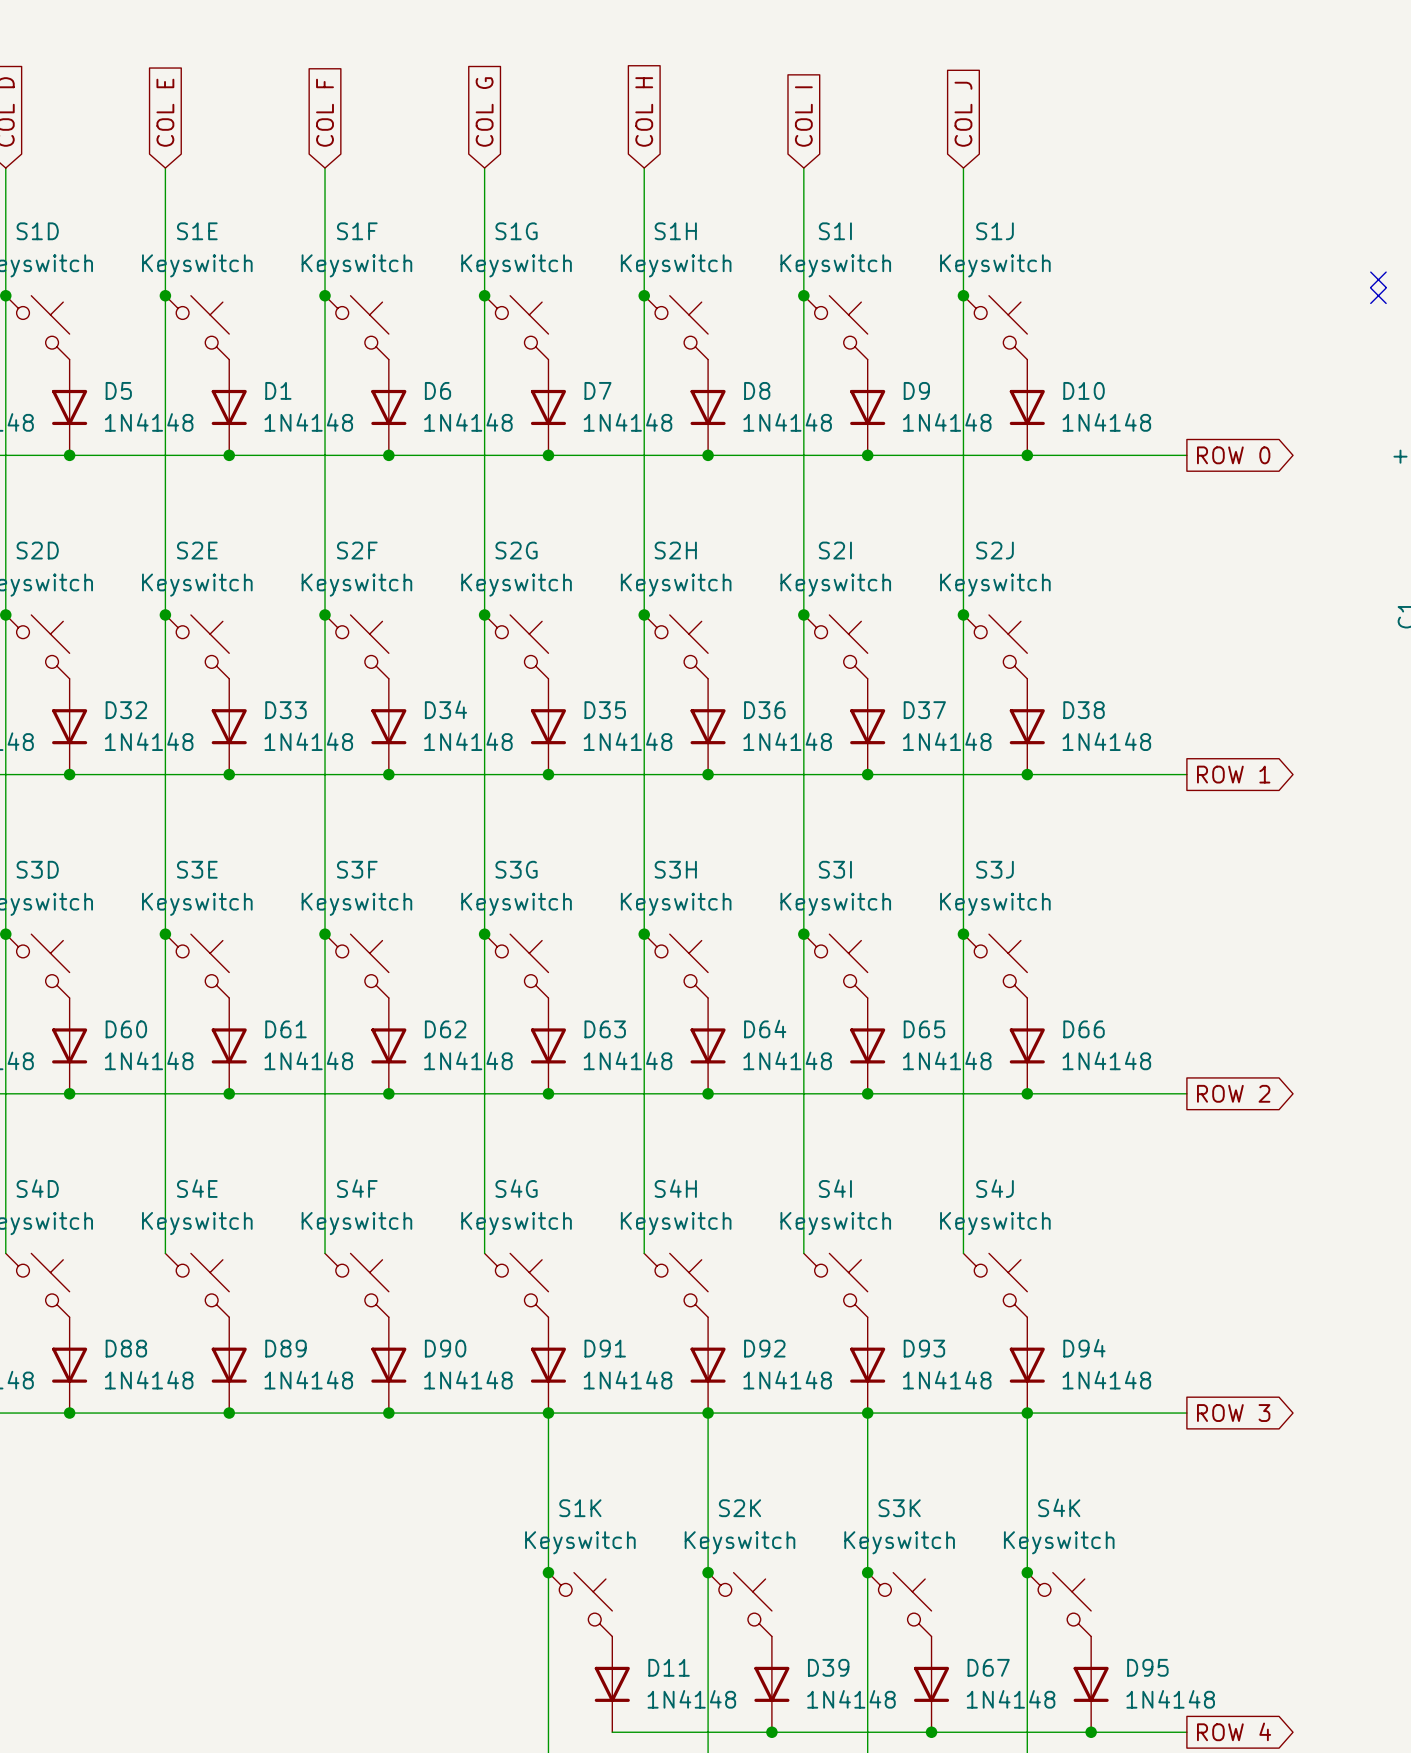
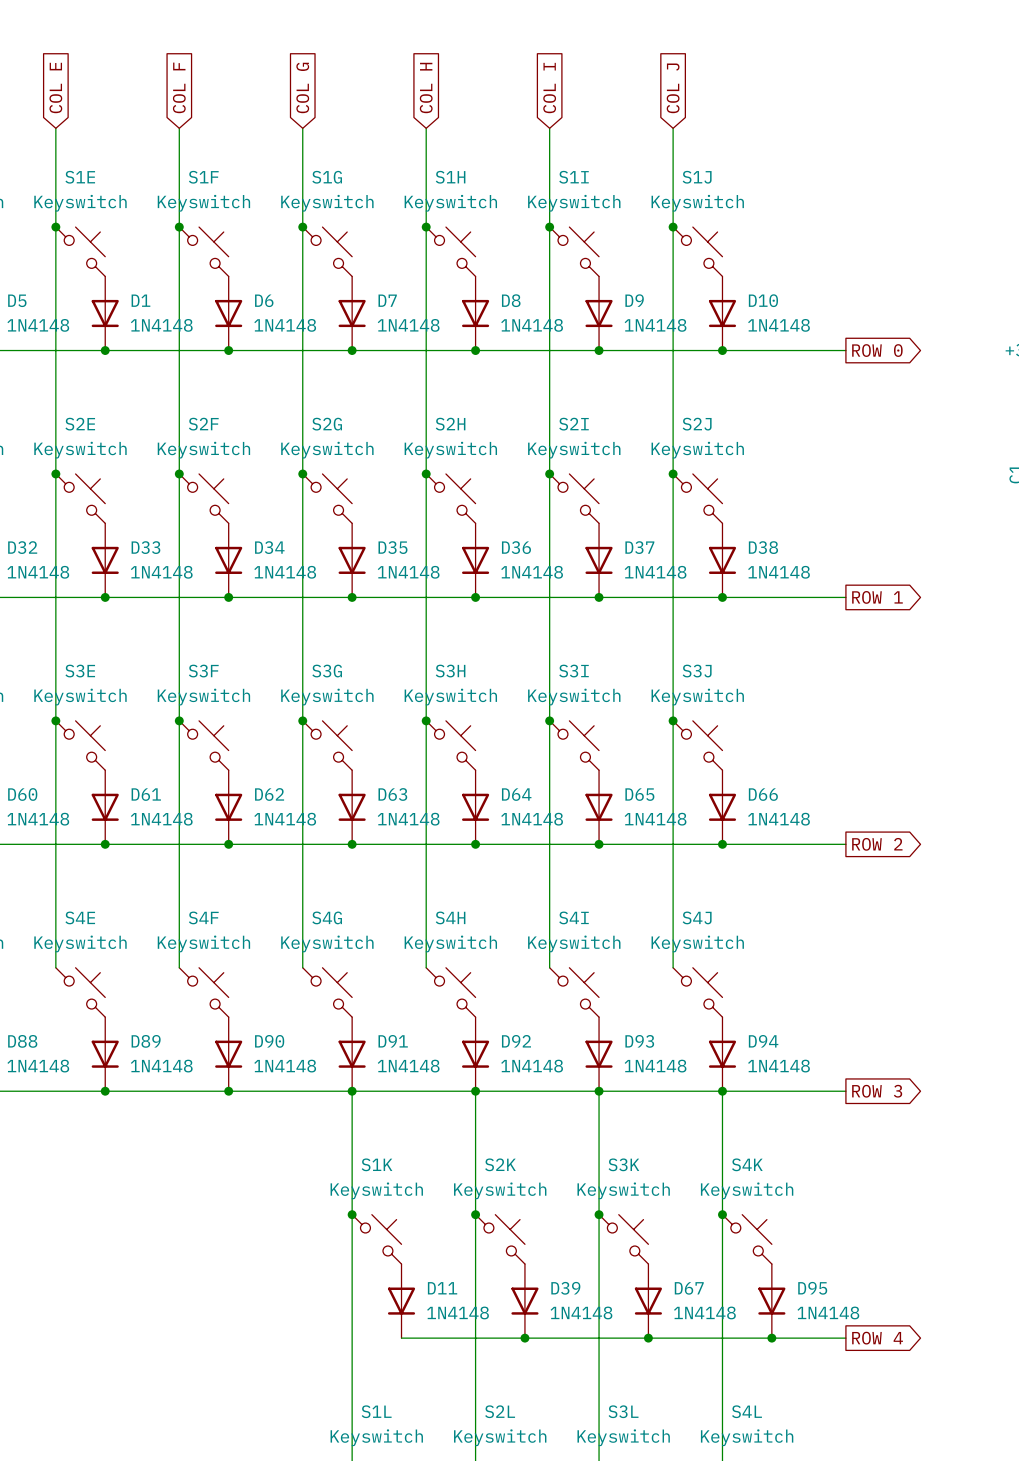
no-connect mark: (1378, 279) -> none
no-connect mark: (1378, 295) -> none

